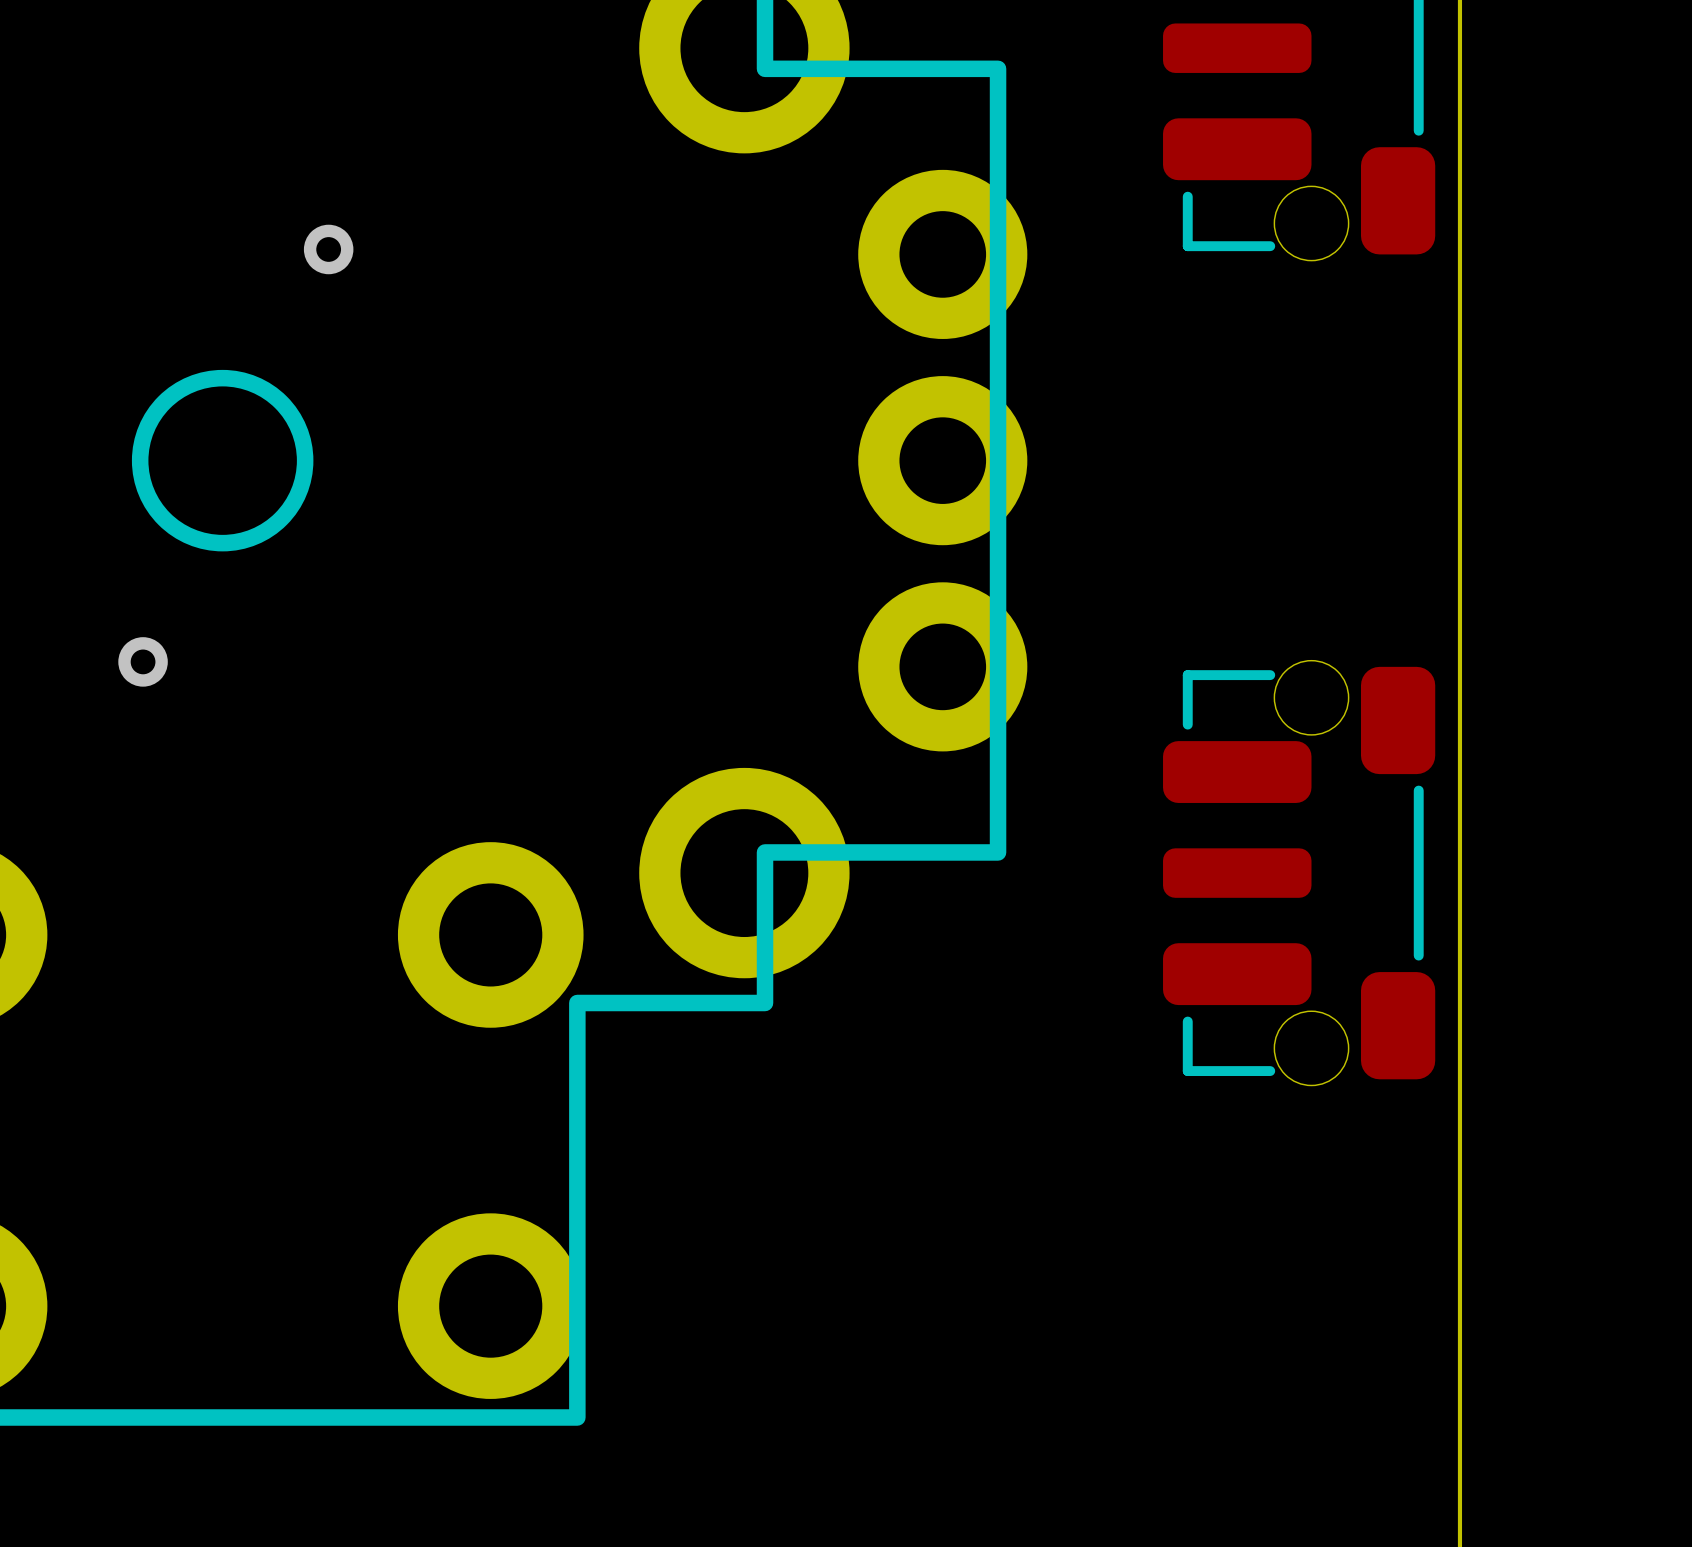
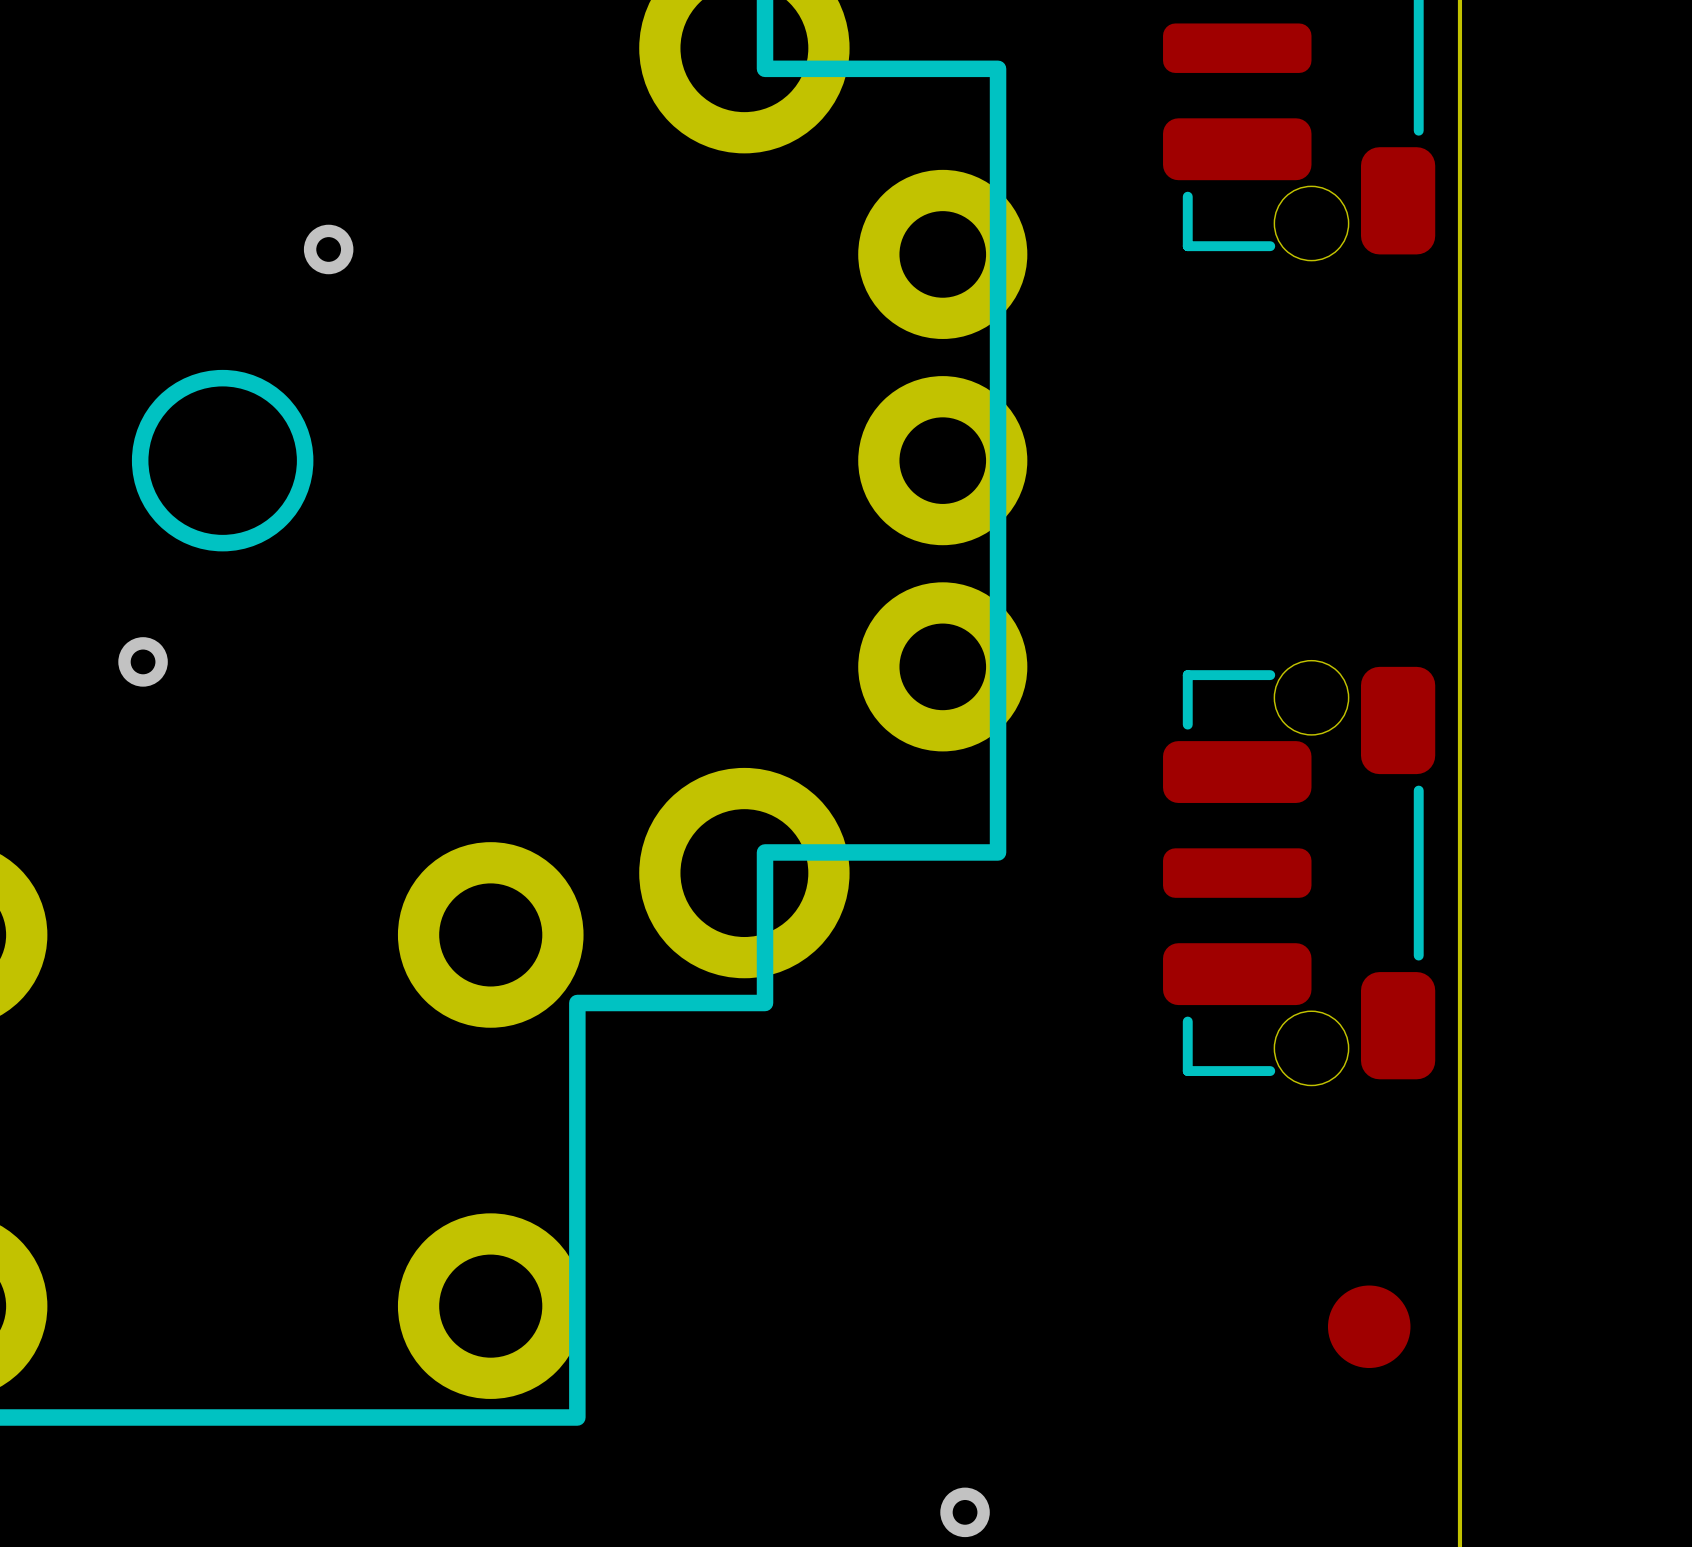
part: none -> (1369, 1326)
via: none -> (965, 1512)

